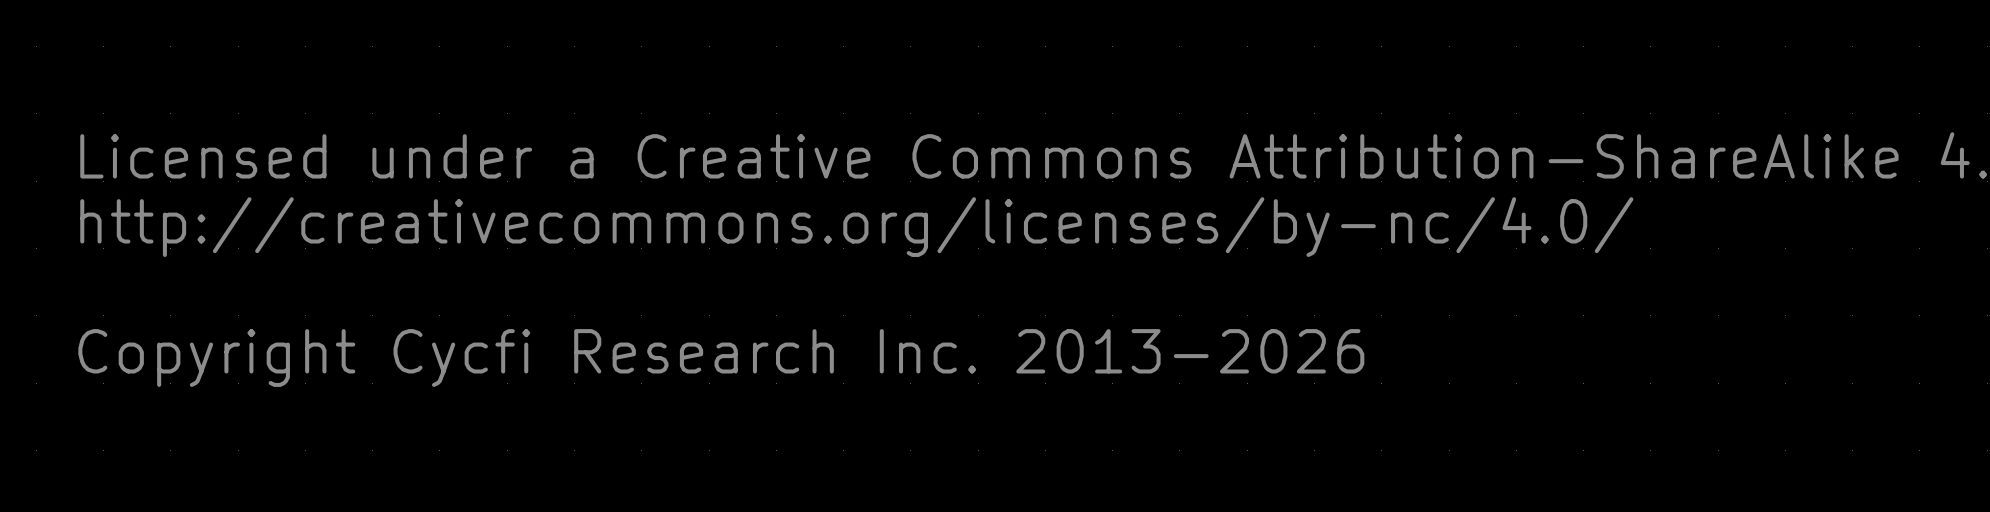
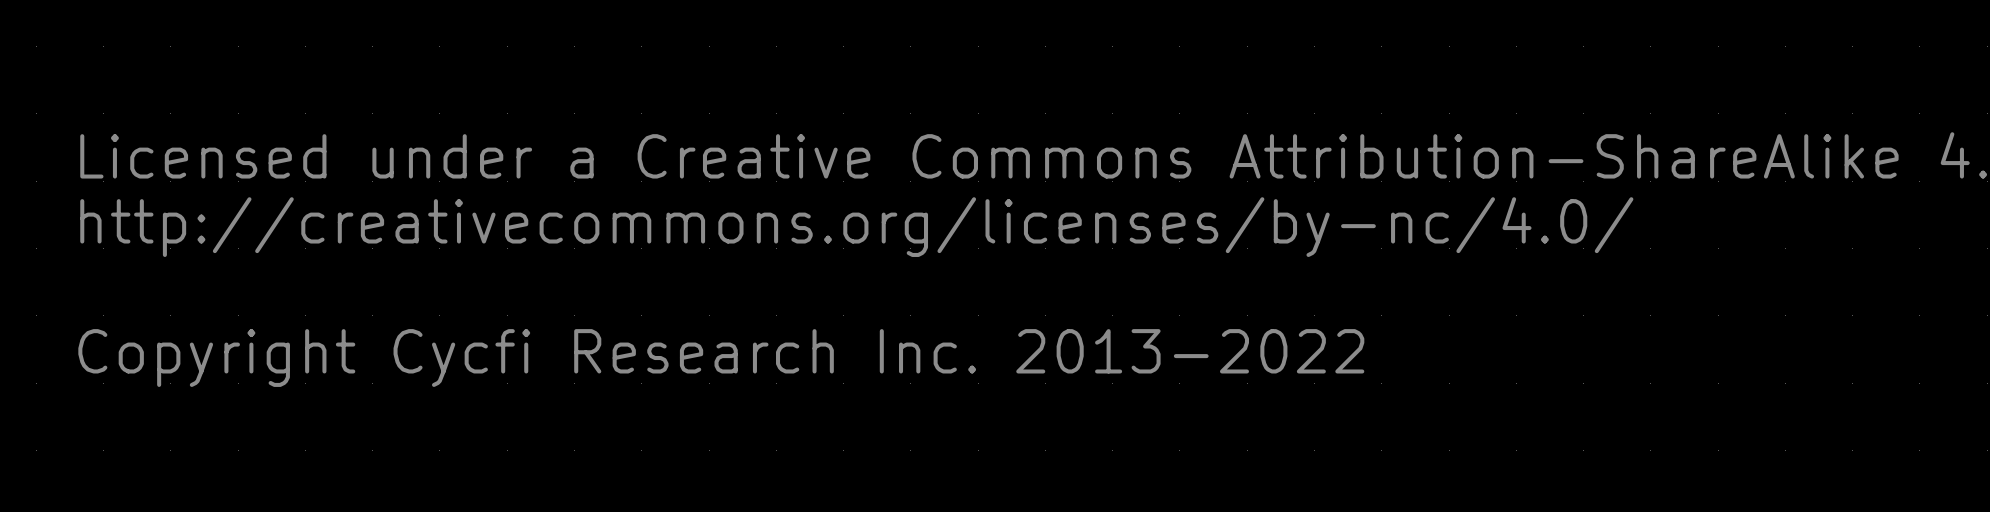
text: Copyright Cycfi Research Inc. 2013-2026 (721, 358) -> Copyright Cycfi Research Inc. 2013-2022 (721, 358)

